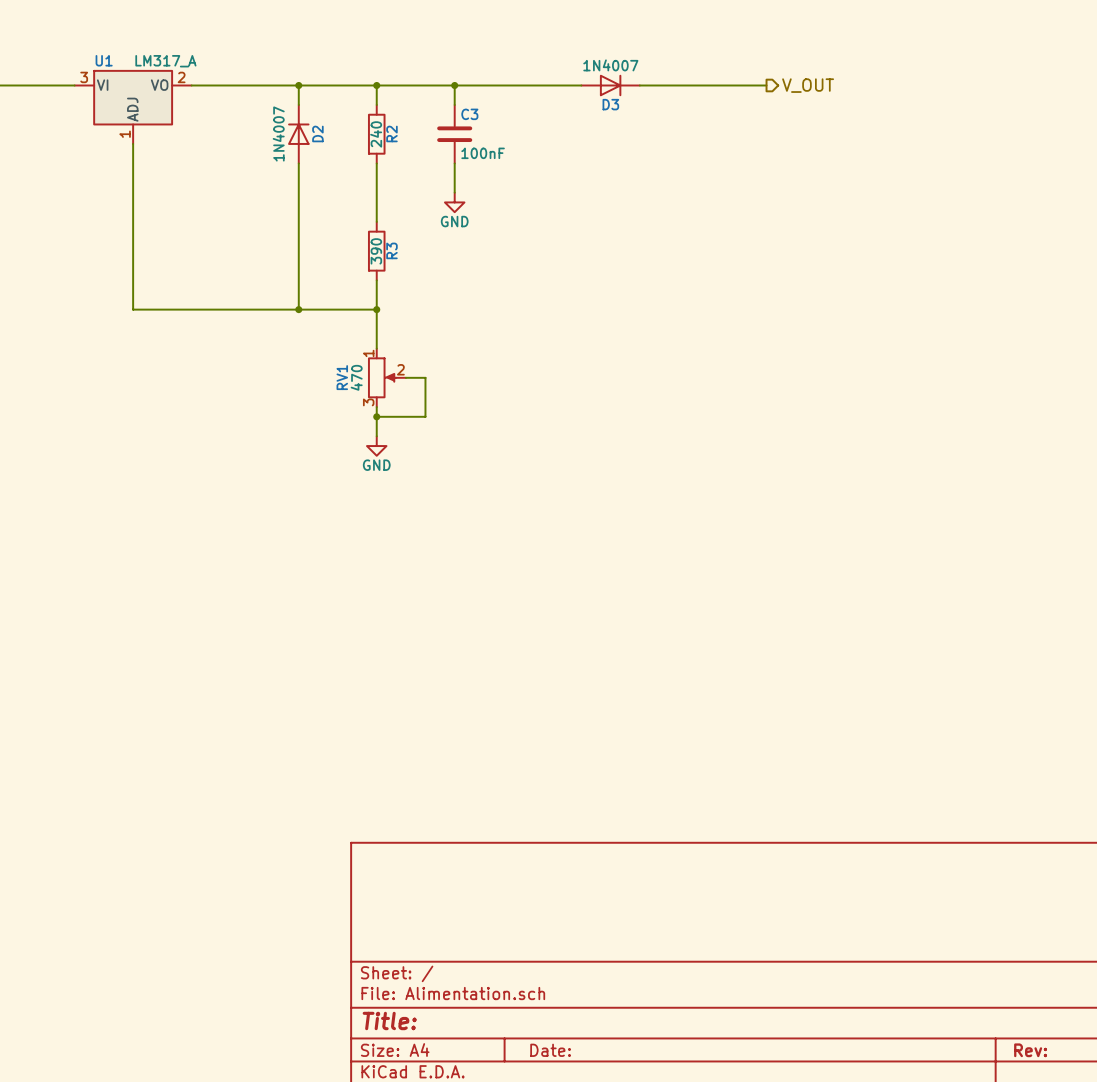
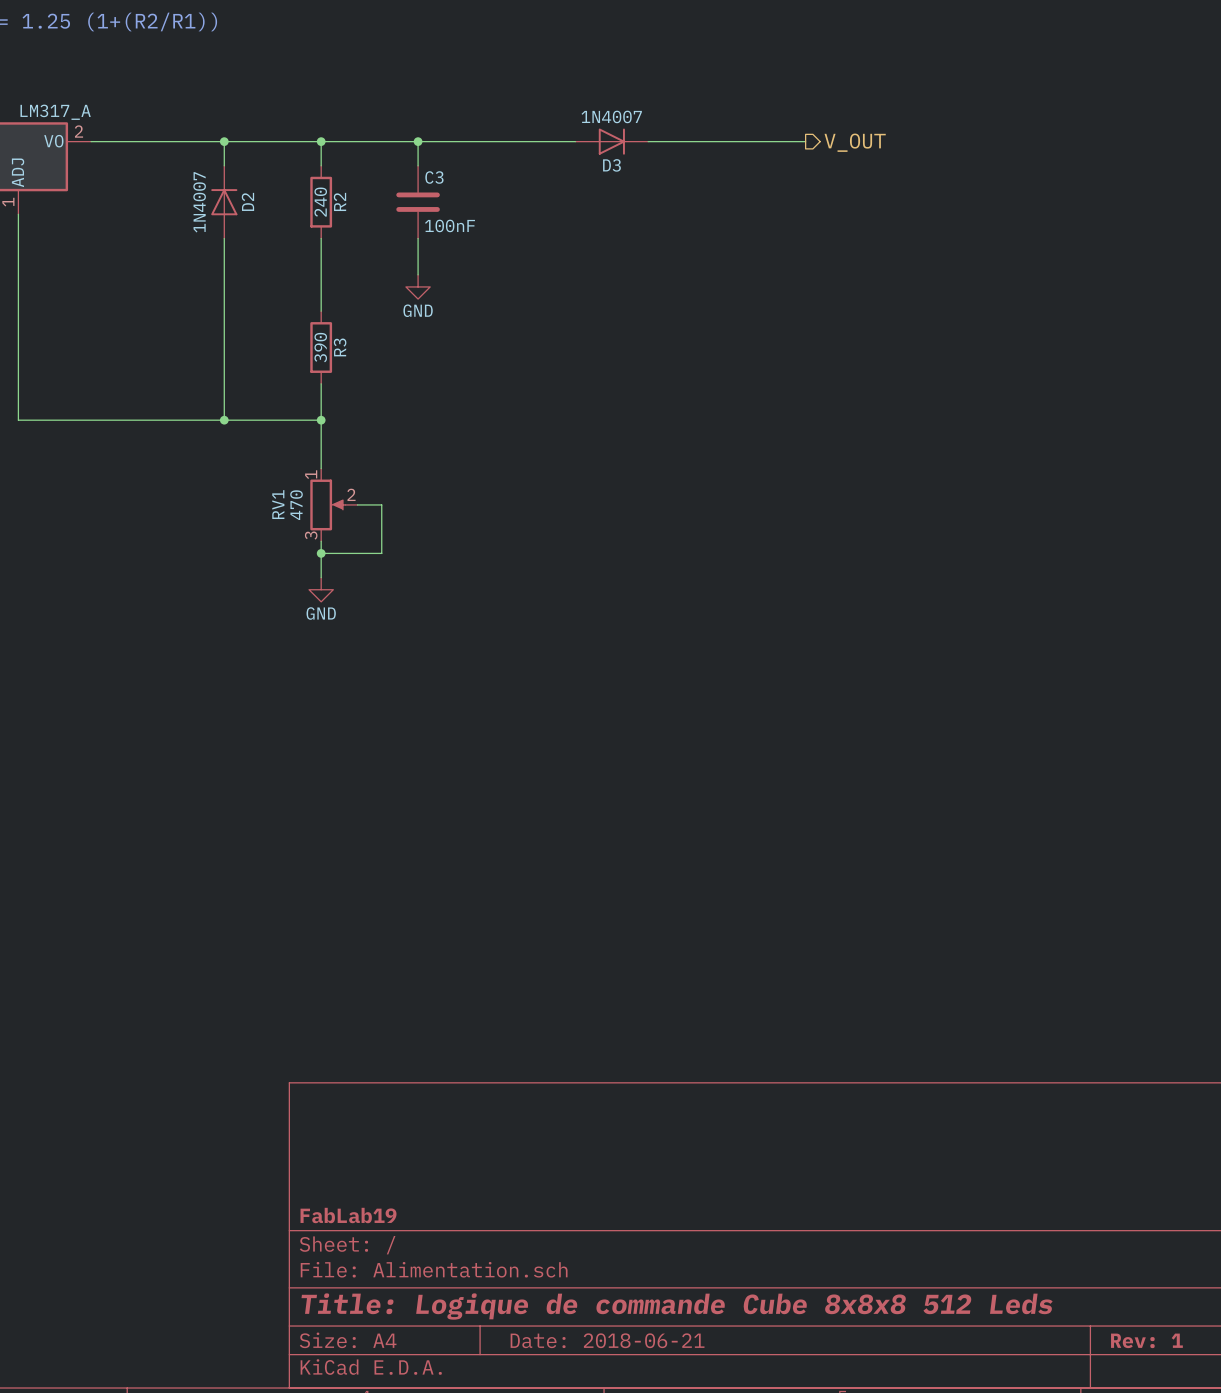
title block: none -> FabLab19 (348, 1215)
title block: Title: (389, 1020) -> Title: Logique de commande Cube 8x8x8 512 Leds (677, 1306)
title block: Date: (550, 1050) -> Date: 2018-06-21 (607, 1340)
title block: Rev: (1030, 1050) -> Rev: 1 (1146, 1340)

